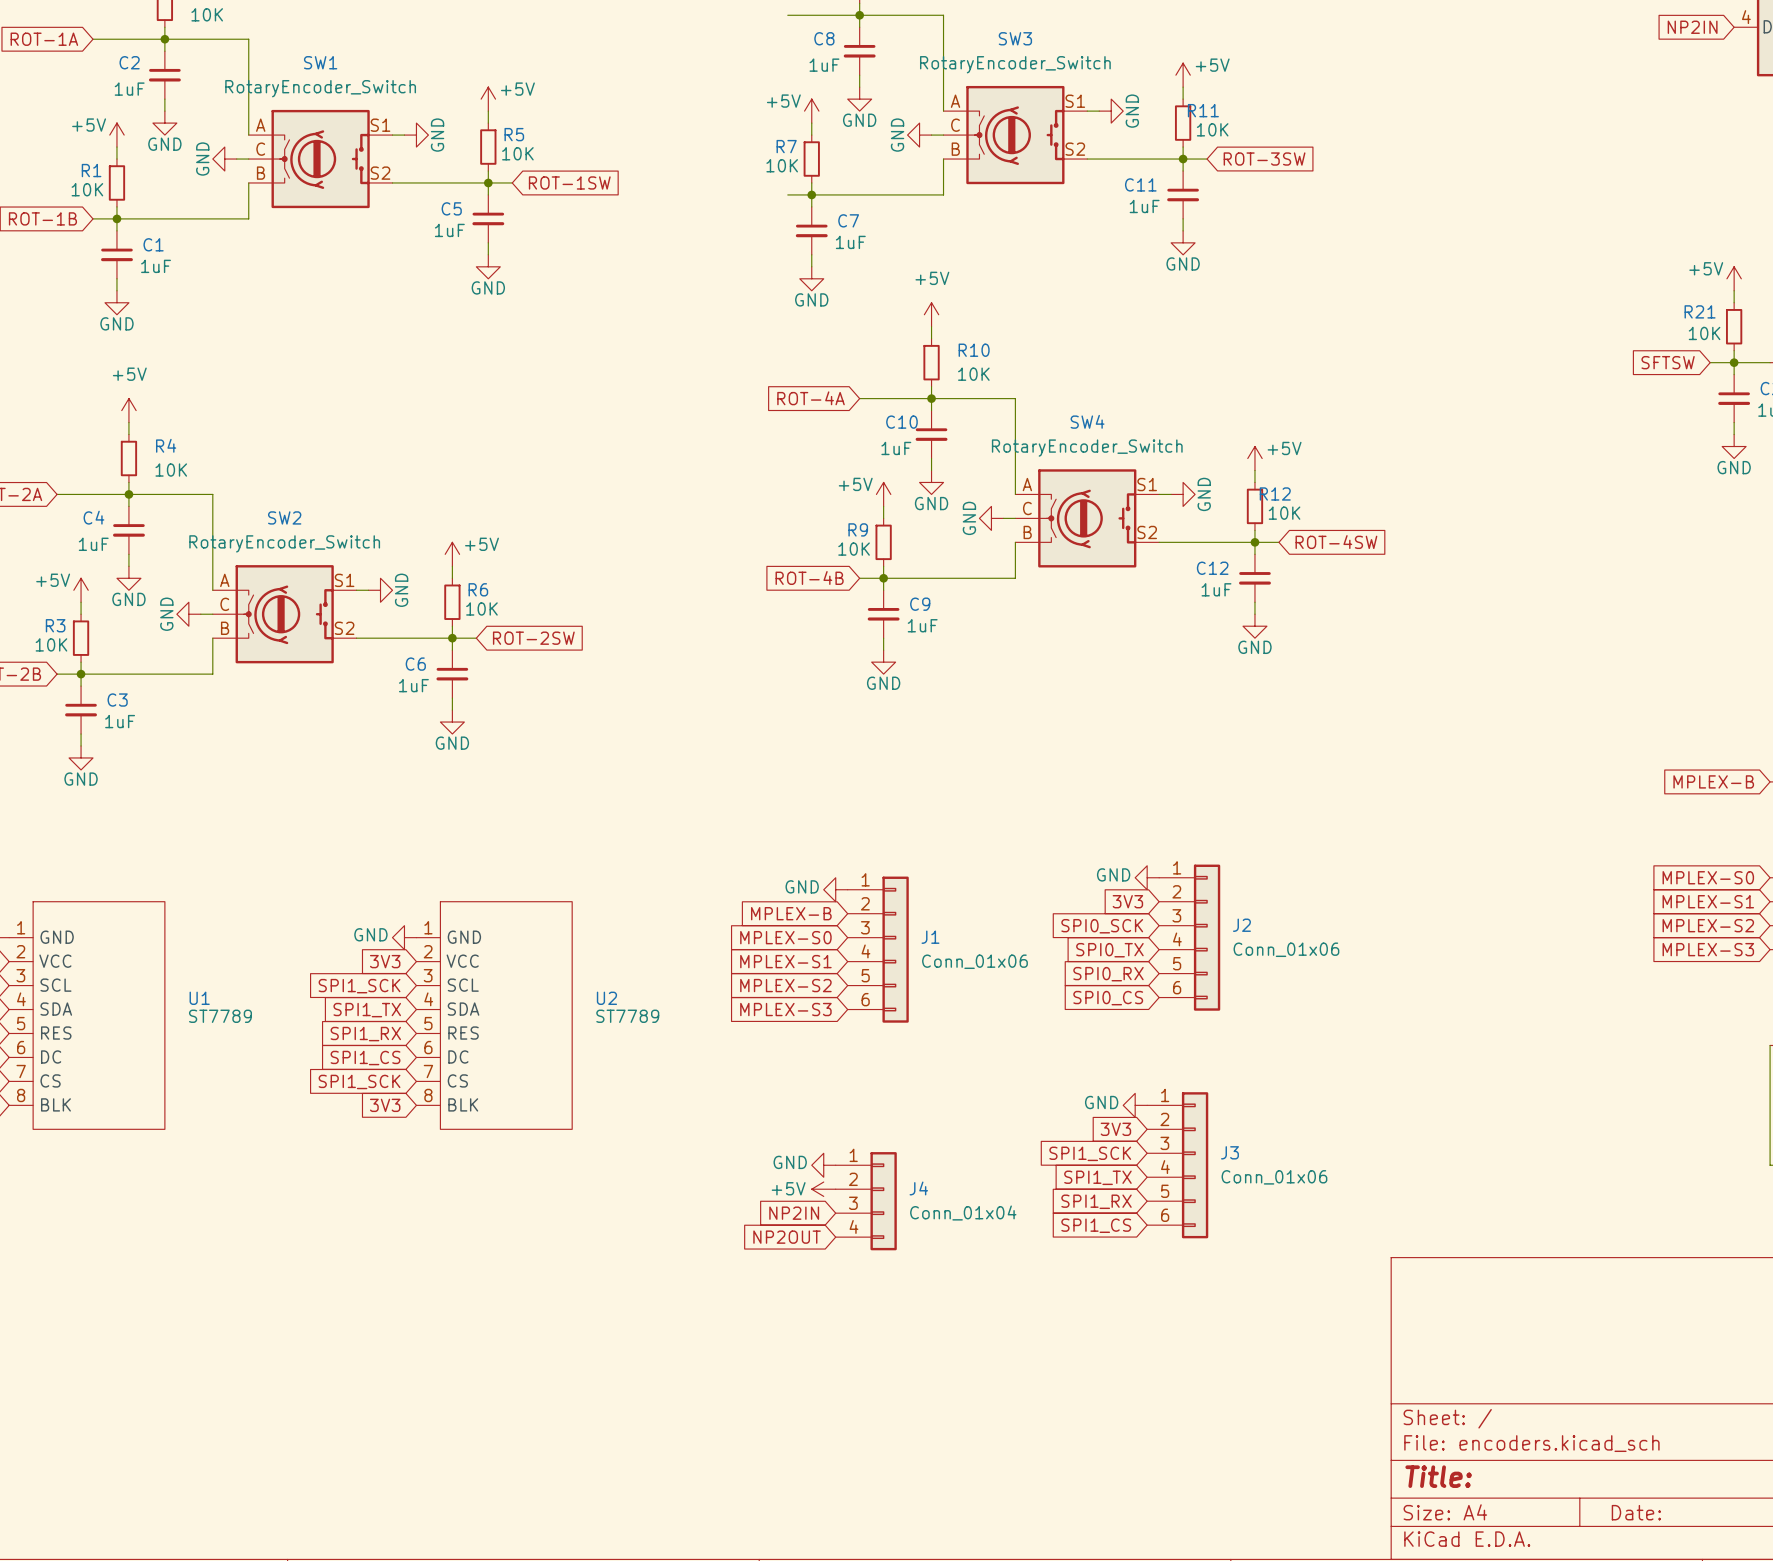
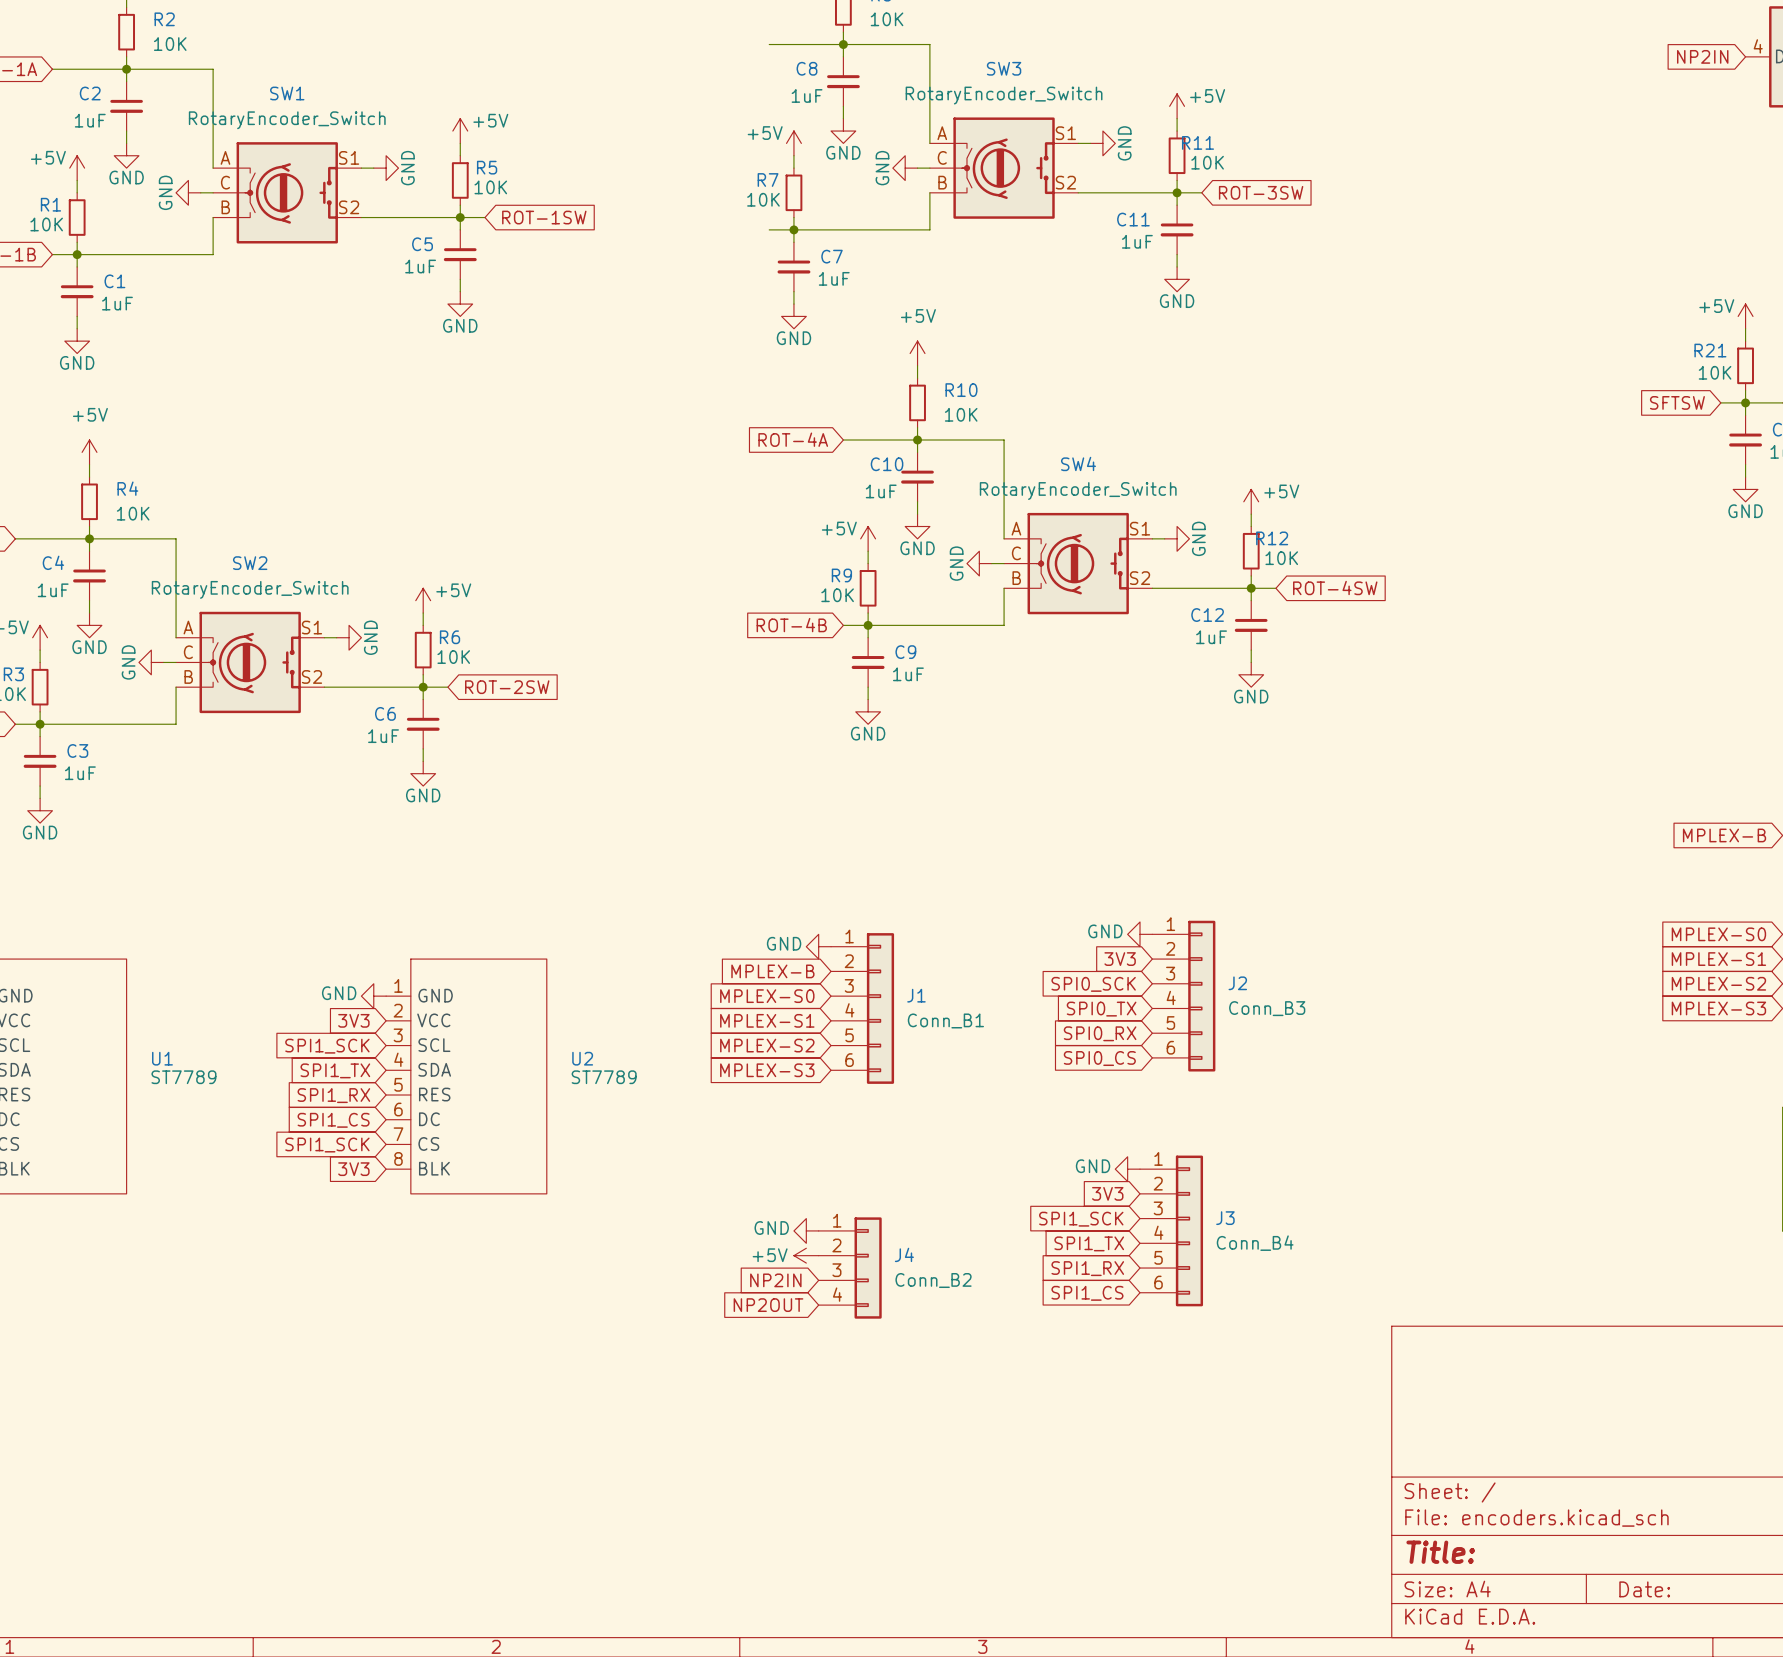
J2 value: Conn_01x06 (1286, 949) -> Conn_B3 (1267, 1008)
J1 value: Conn_01x06 (974, 961) -> Conn_B1 (945, 1020)
J3 value: Conn_01x06 (1274, 1177) -> Conn_B4 (1255, 1243)
J4 value: Conn_01x04 (963, 1213) -> Conn_B2 (933, 1280)

